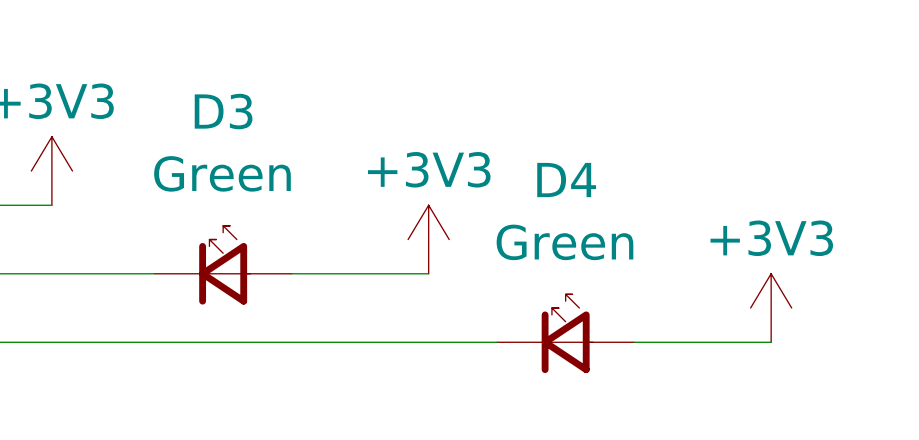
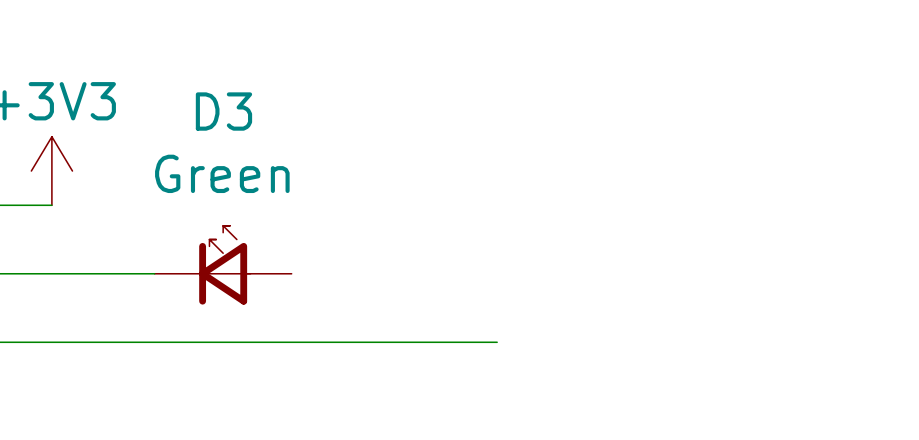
power symbol: +3V3 (428, 239) -> none
wire: (291, 273) (428, 273) -> none
power symbol: +3V3 (771, 308) -> none
D4: Green (565, 333) -> none
wire: (634, 342) (771, 342) -> none

